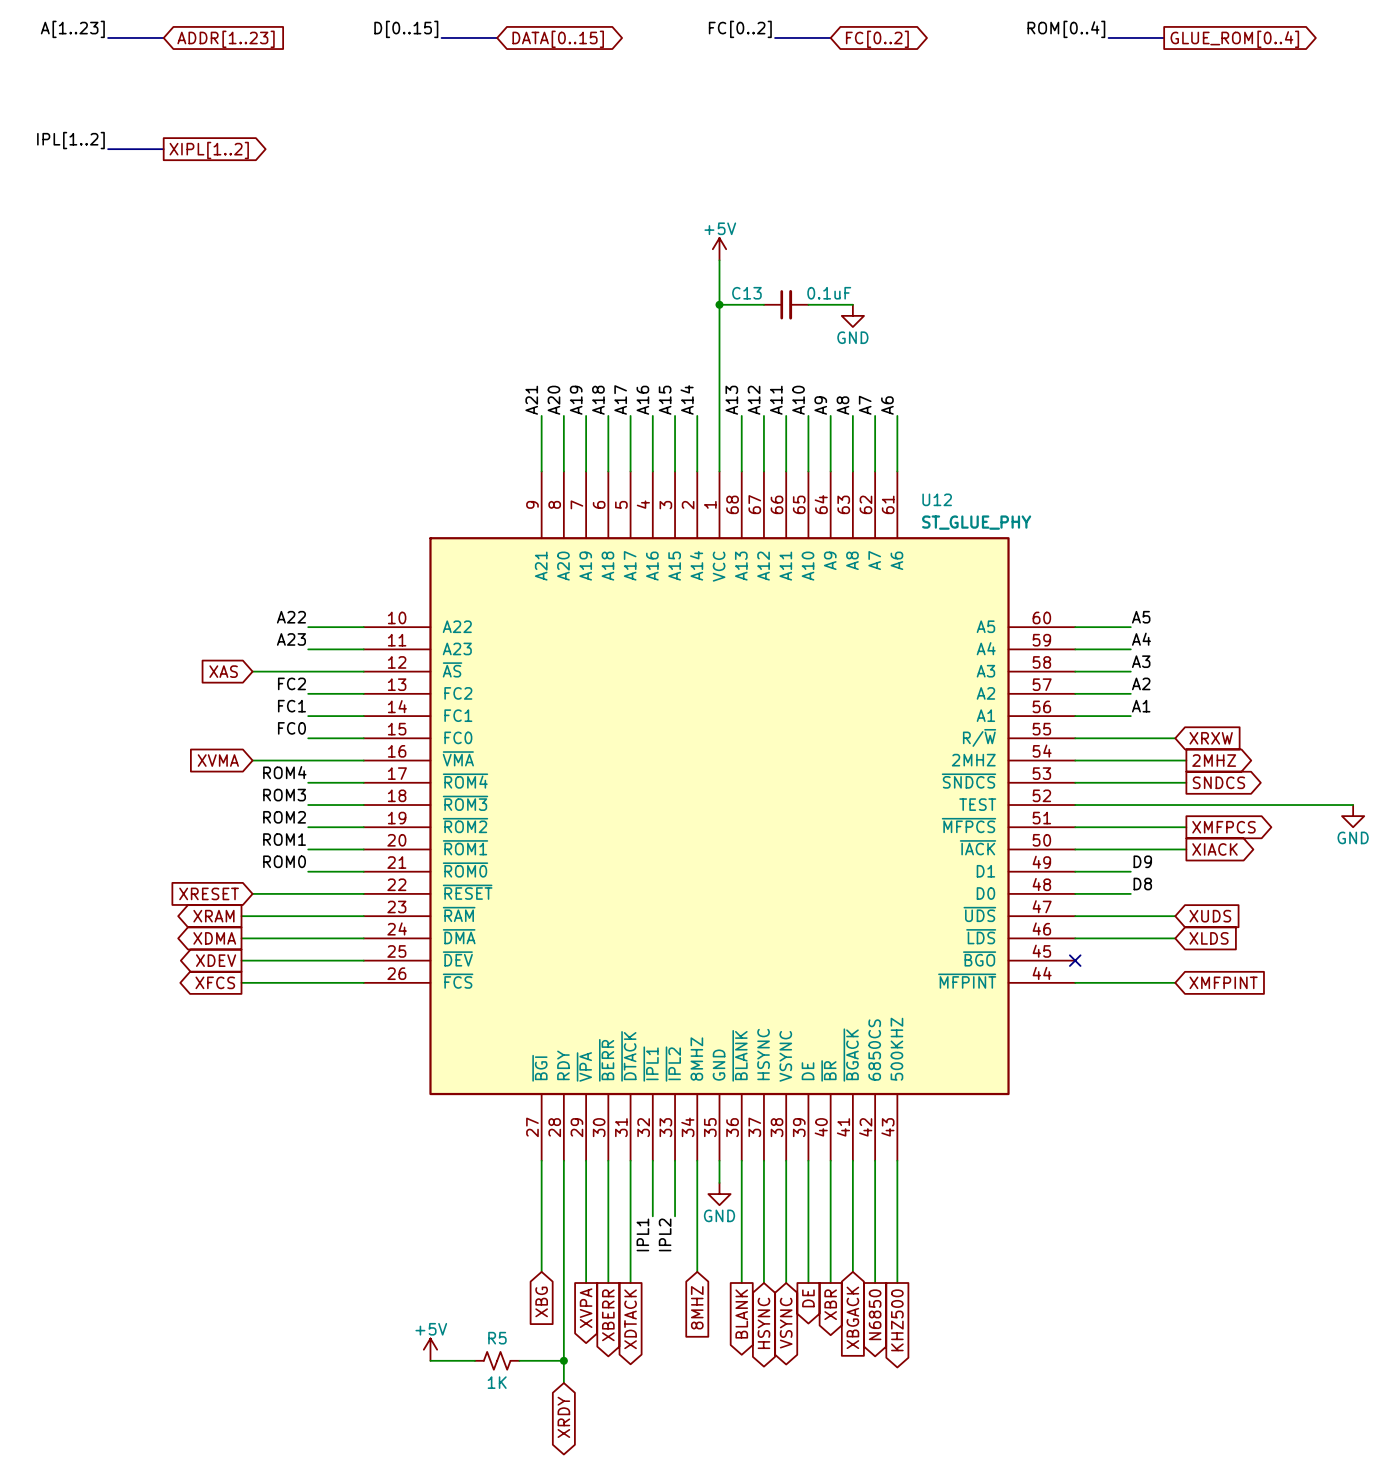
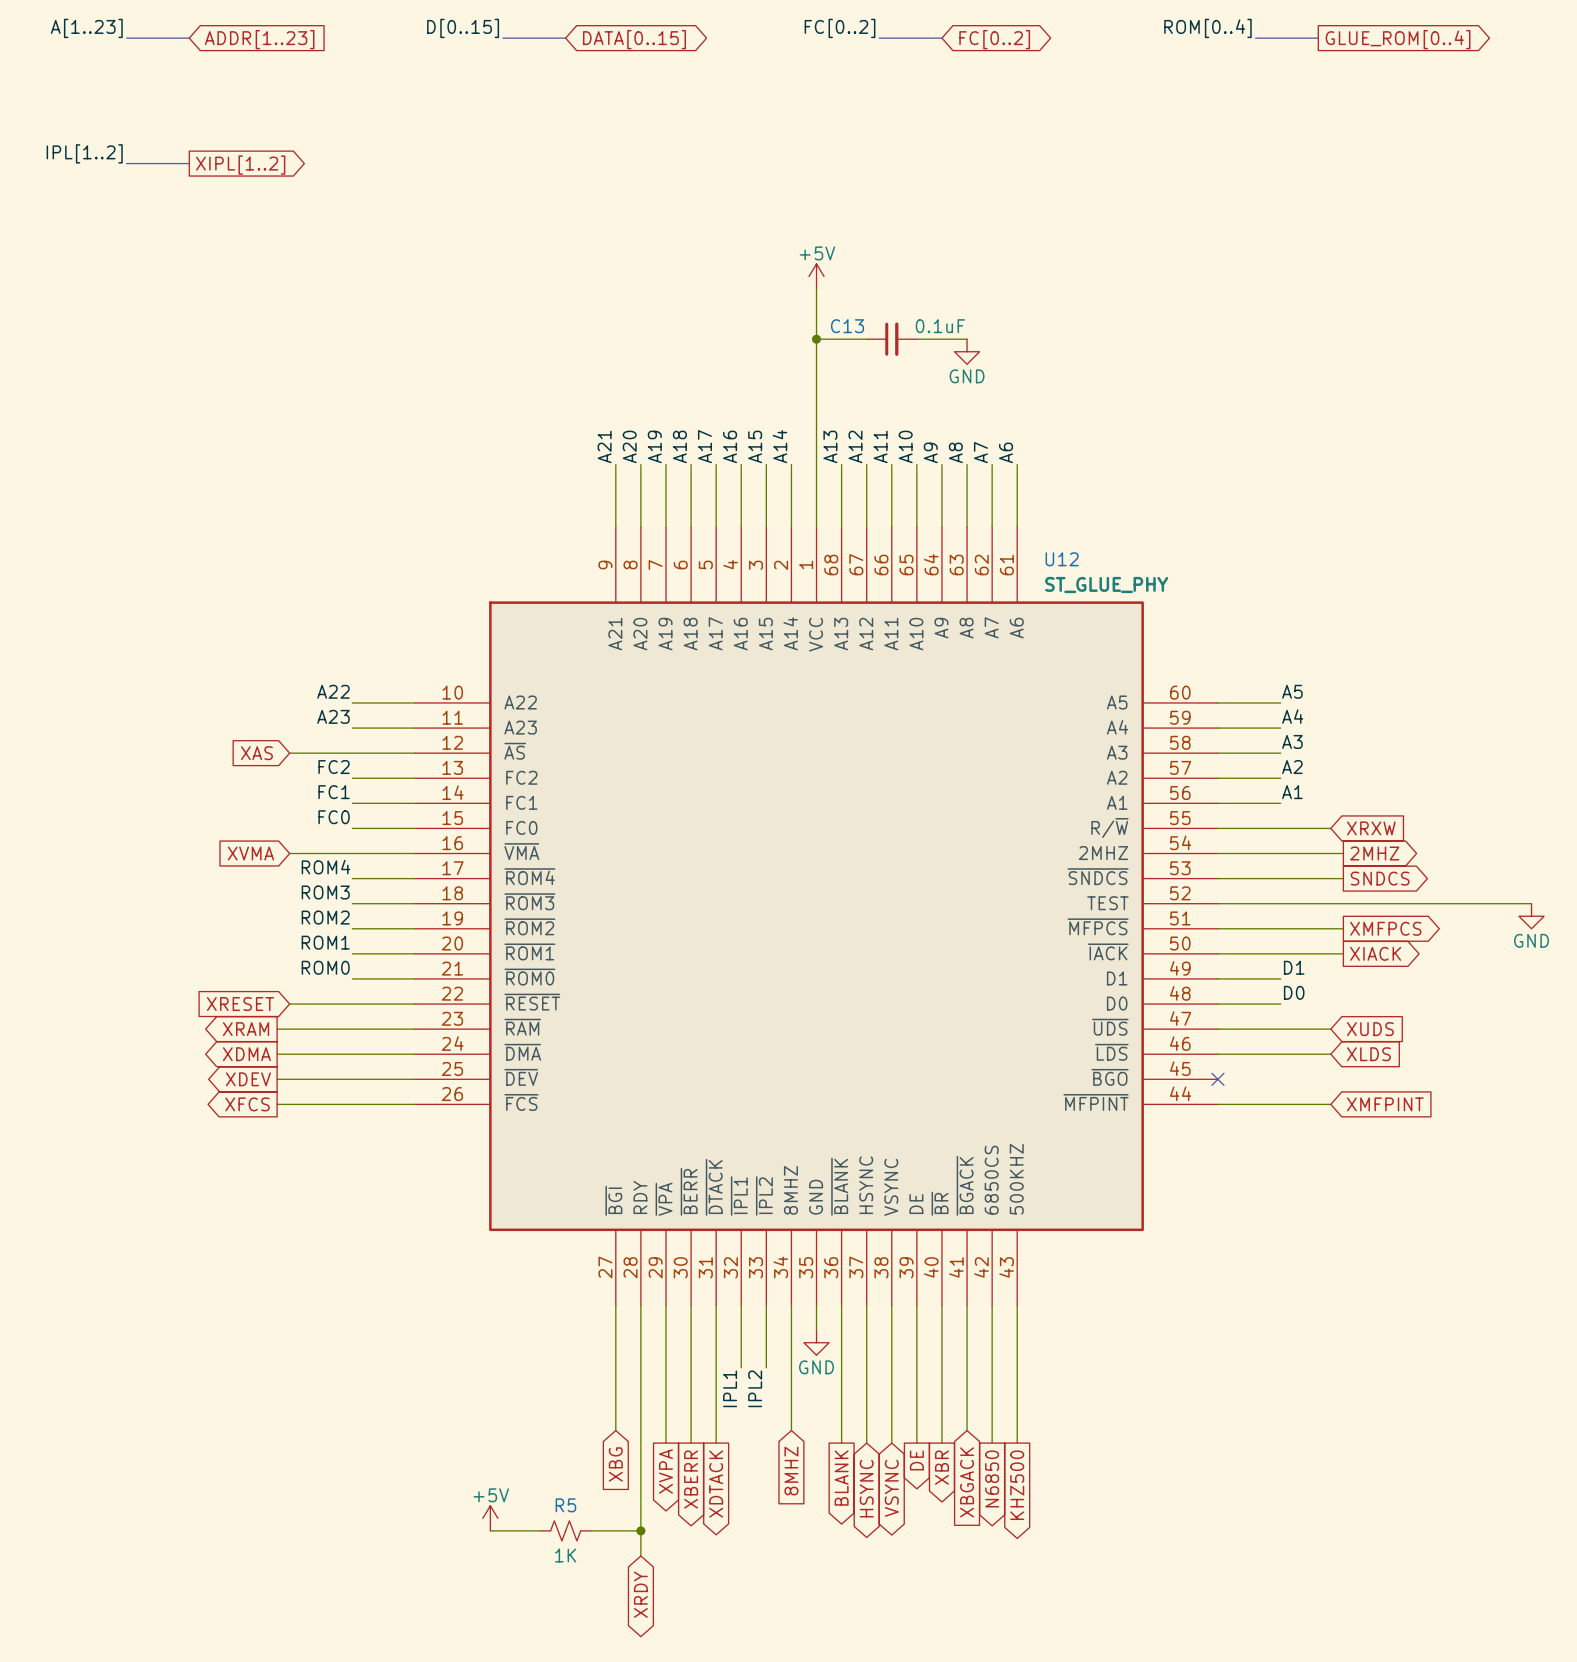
label: D9 (1142, 861) -> D1 (1294, 967)
label: D8 (1142, 884) -> D0 (1294, 992)

